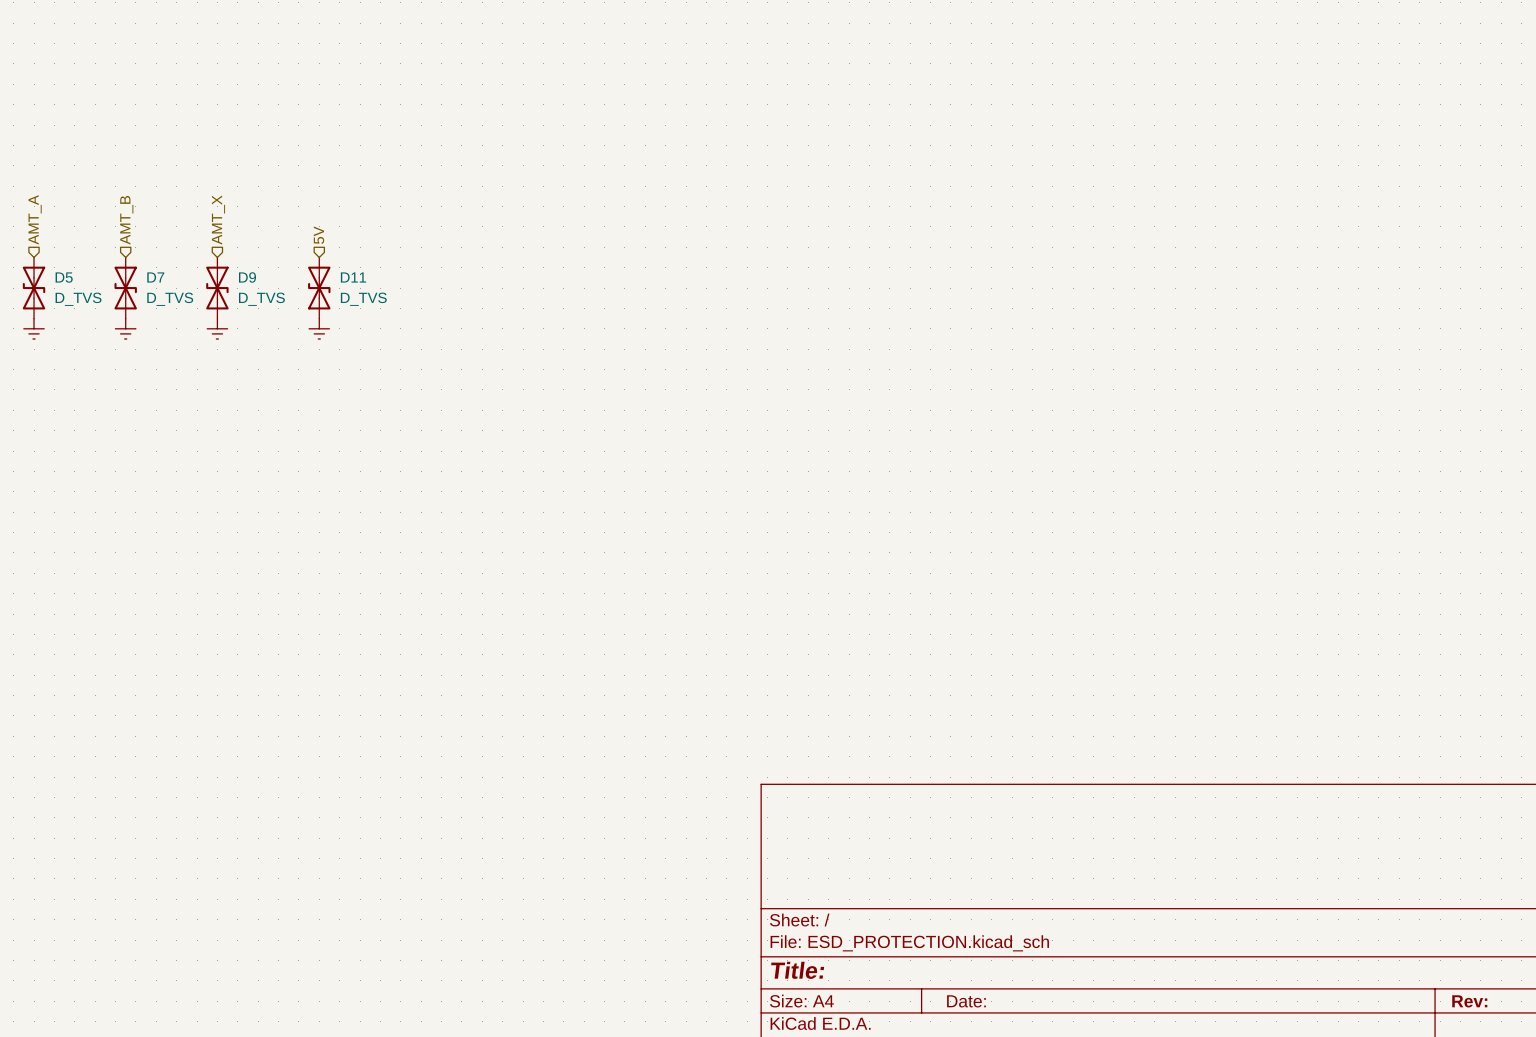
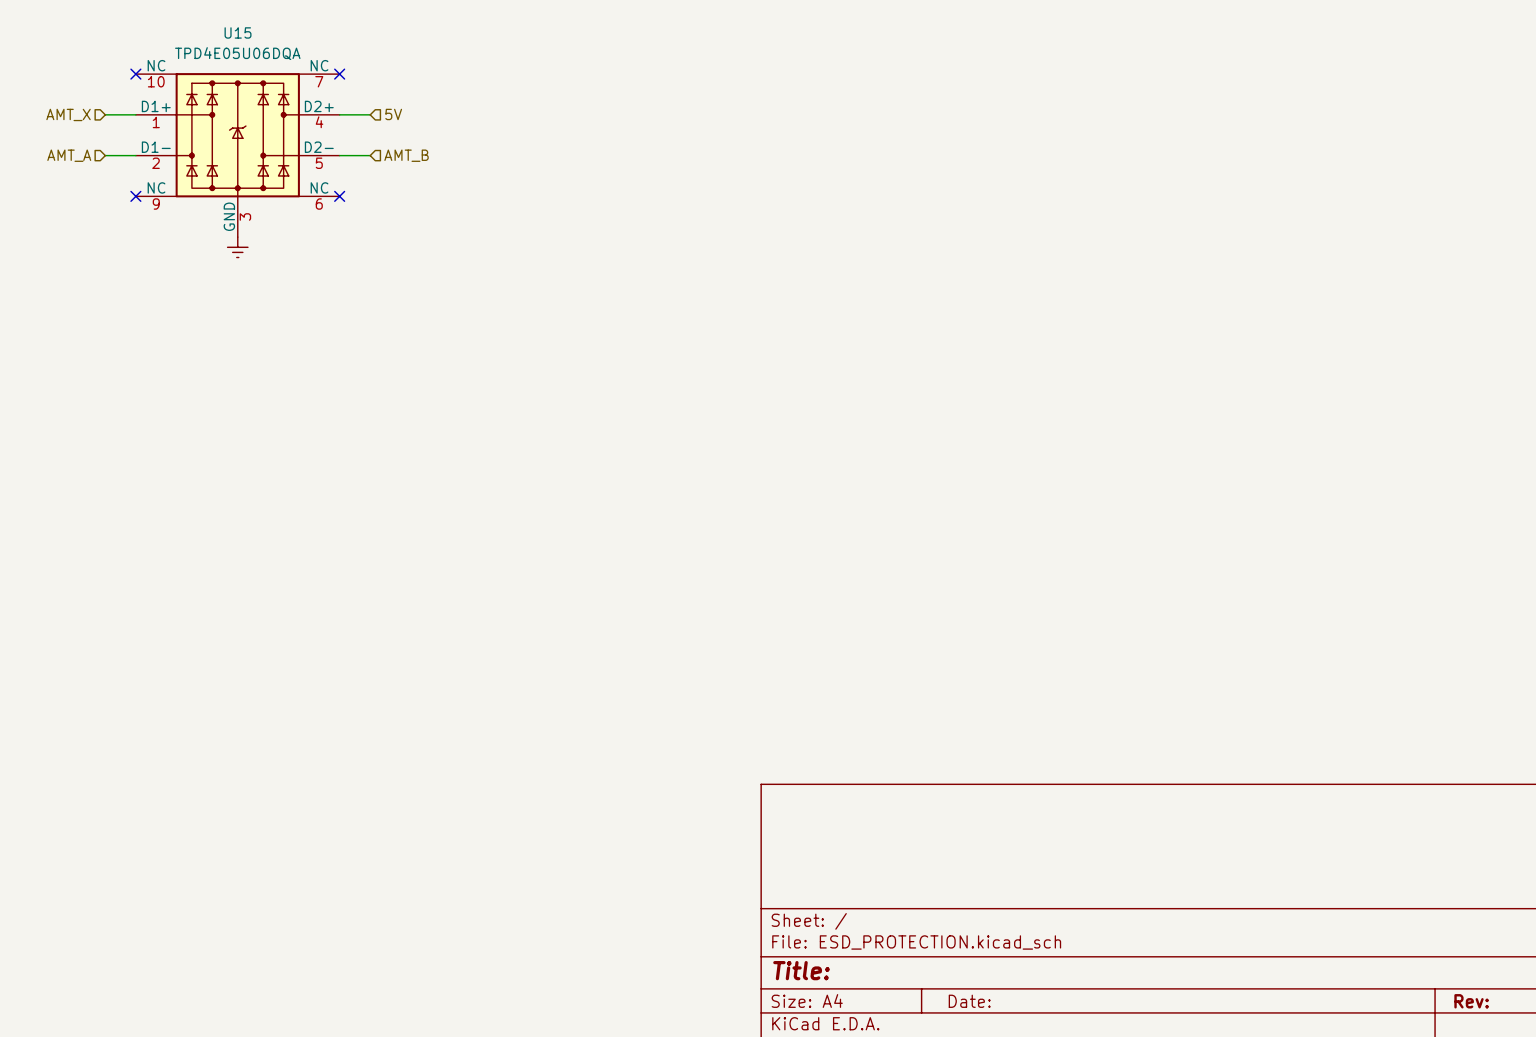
no-connect mark: none -> (135, 74)
no-connect mark: none -> (339, 74)
wire: none -> (105, 114) (135, 114)
wire: none -> (339, 114) (370, 114)
wire: none -> (105, 155) (135, 155)
U15: none -> TPD4E05U06DQA (237, 155)
wire: none -> (339, 155) (370, 155)
hierarchical label: none -> AMT_B (406, 155)
no-connect mark: none -> (135, 196)
no-connect mark: none -> (339, 196)
hierarchical label rotation: 0° (35, 219) -> 90° counterclockwise (69, 155)
hierarchical label position: AMT_A (35, 219) -> AMT_A (69, 155)
hierarchical label: AMT_B (126, 220) -> none
hierarchical label rotation: 0° (218, 220) -> 90° counterclockwise (68, 114)
hierarchical label position: AMT_X (218, 220) -> AMT_X (68, 114)
hierarchical label rotation: 0° (318, 235) -> 90° clockwise (393, 114)
hierarchical label position: 5V (318, 235) -> 5V (393, 114)
power symbol: none -> (237, 247)
D5: D_TVS (34, 288) -> none
D7: D_TVS (125, 288) -> none
D9: D_TVS (217, 288) -> none
D11: D_TVS (319, 288) -> none
power symbol: (34, 328) -> none
power symbol: (125, 328) -> none
power symbol: (217, 328) -> none
power symbol: (319, 328) -> none

